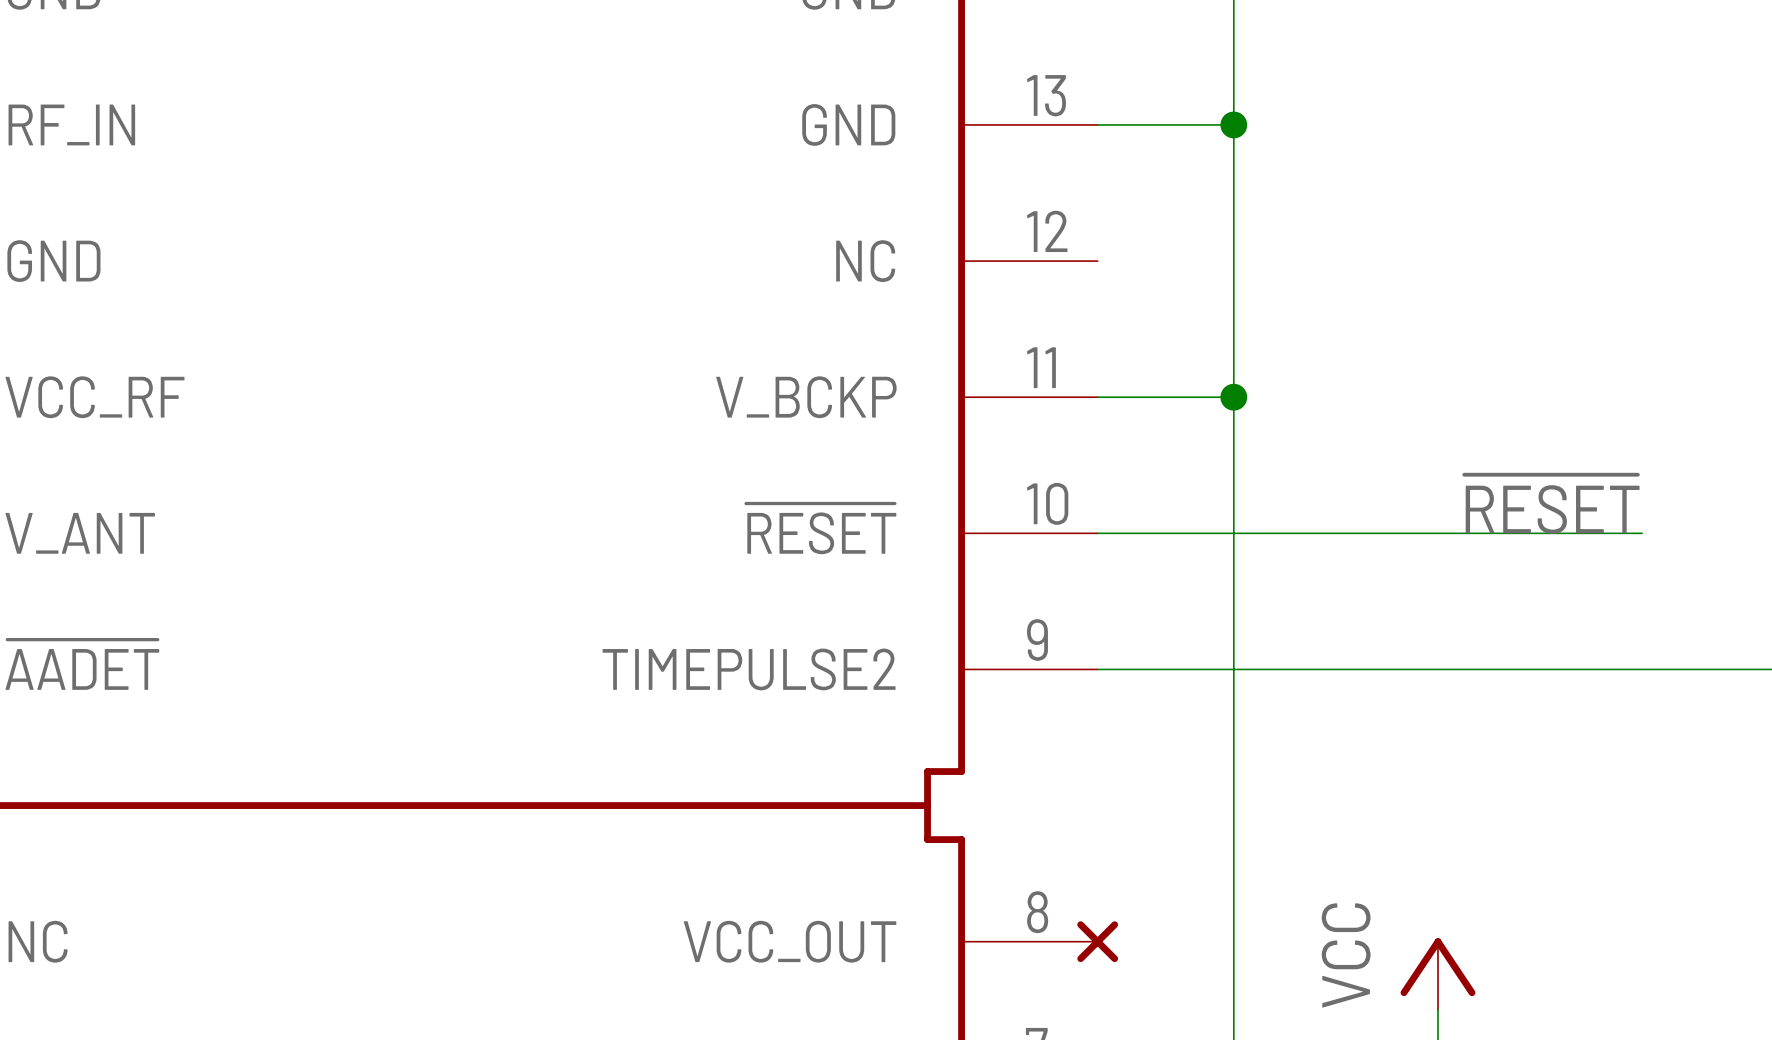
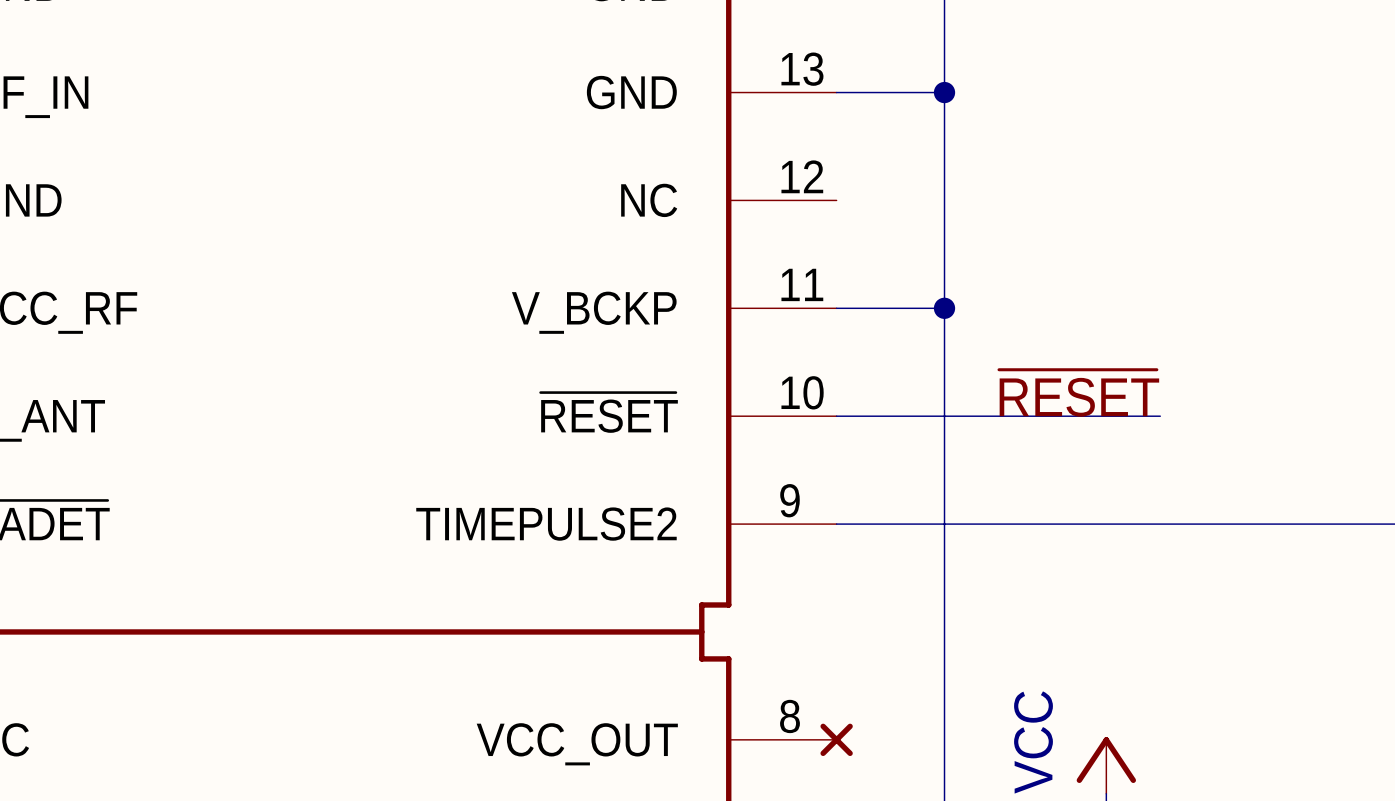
label position: ~{RESET} (1551, 504) -> ~{RESET} (1079, 393)
wire: (1506, 533) (1642, 533) -> none

